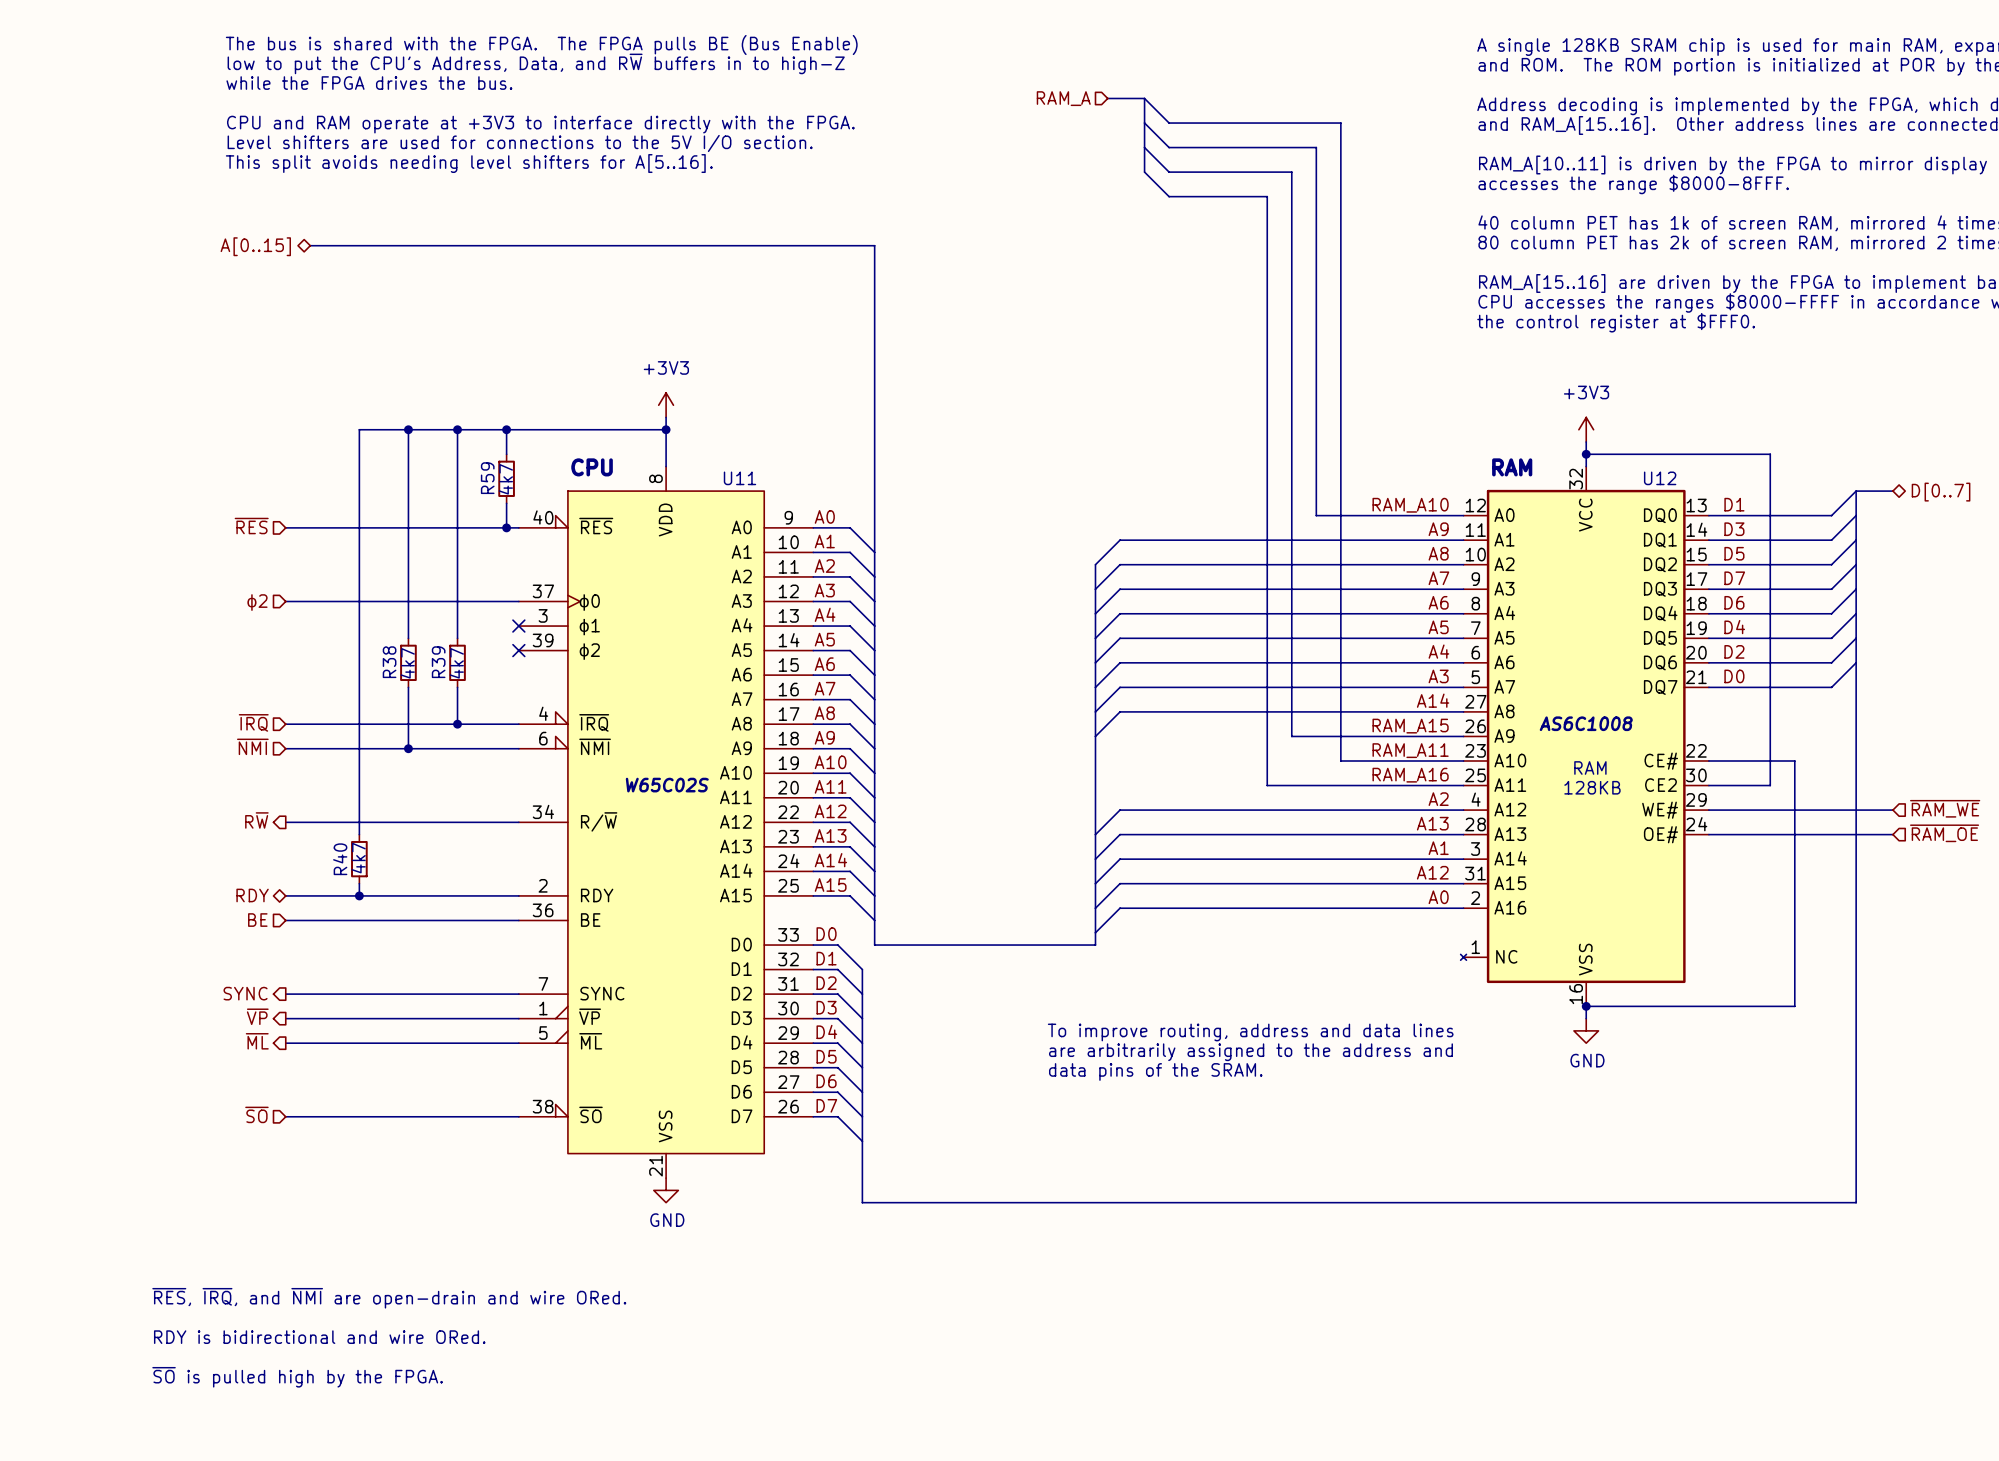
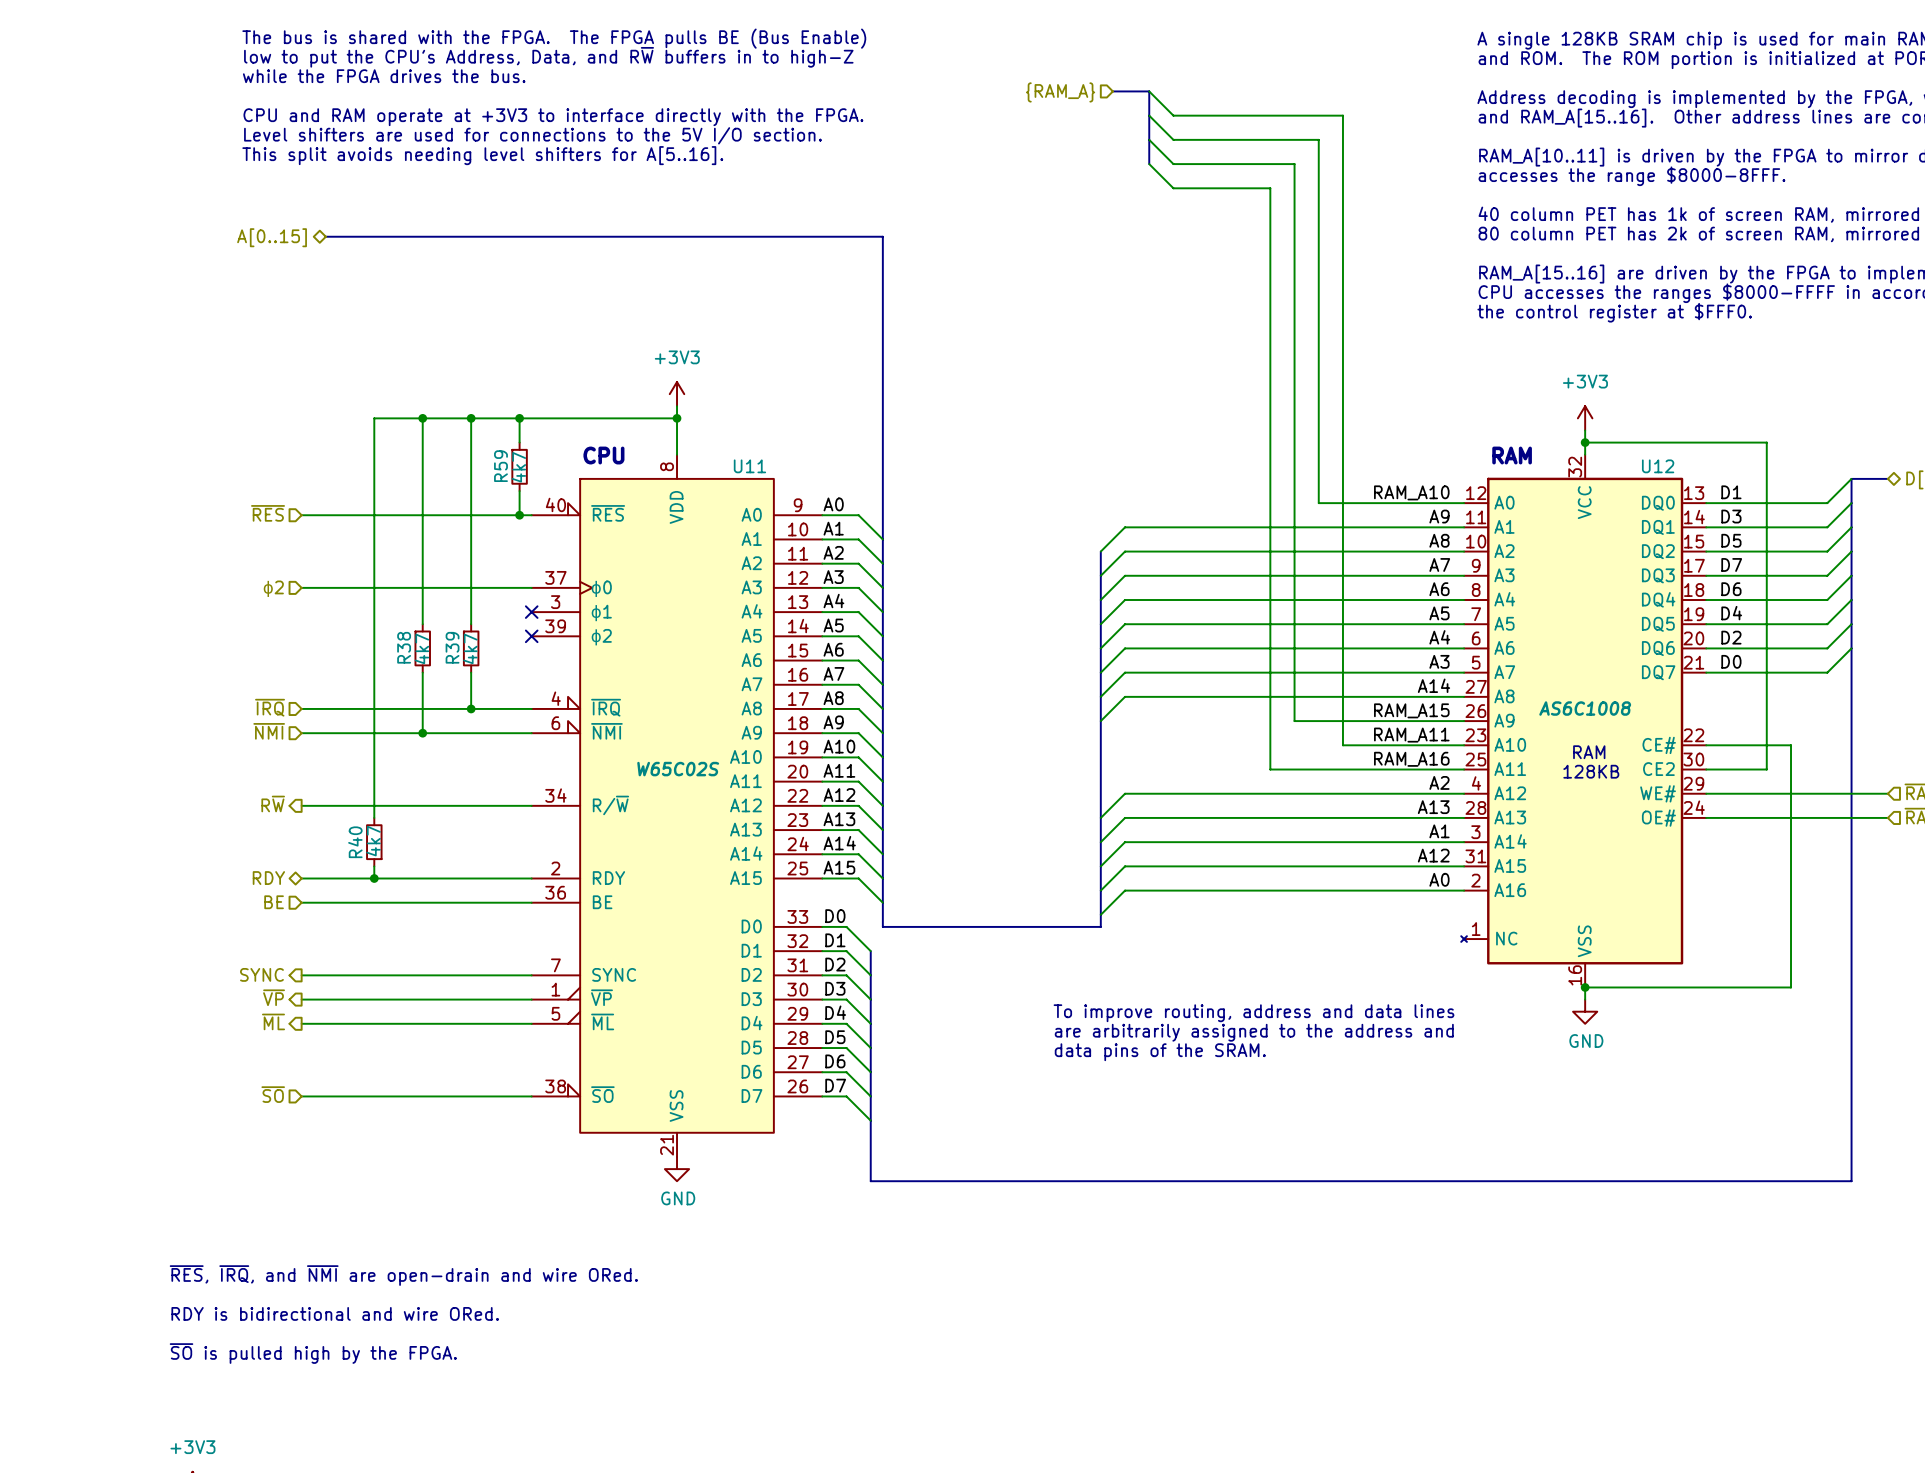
hierarchical label: RAM_A (1063, 98) -> {RAM_A} (1060, 92)

